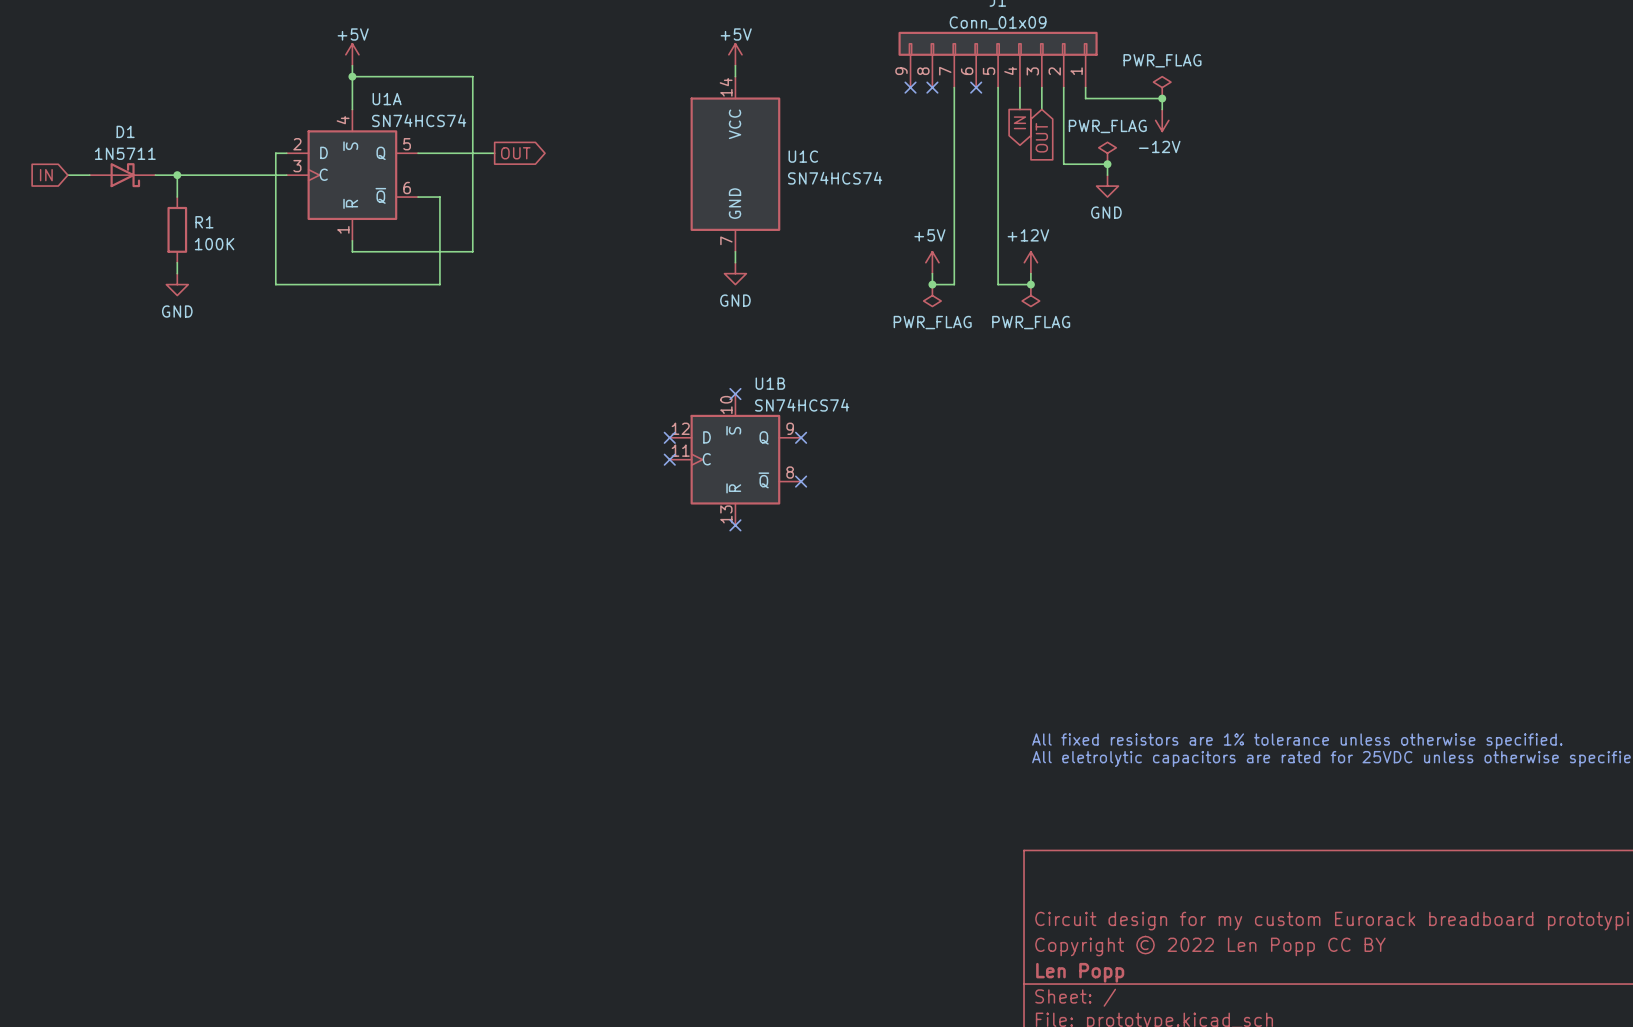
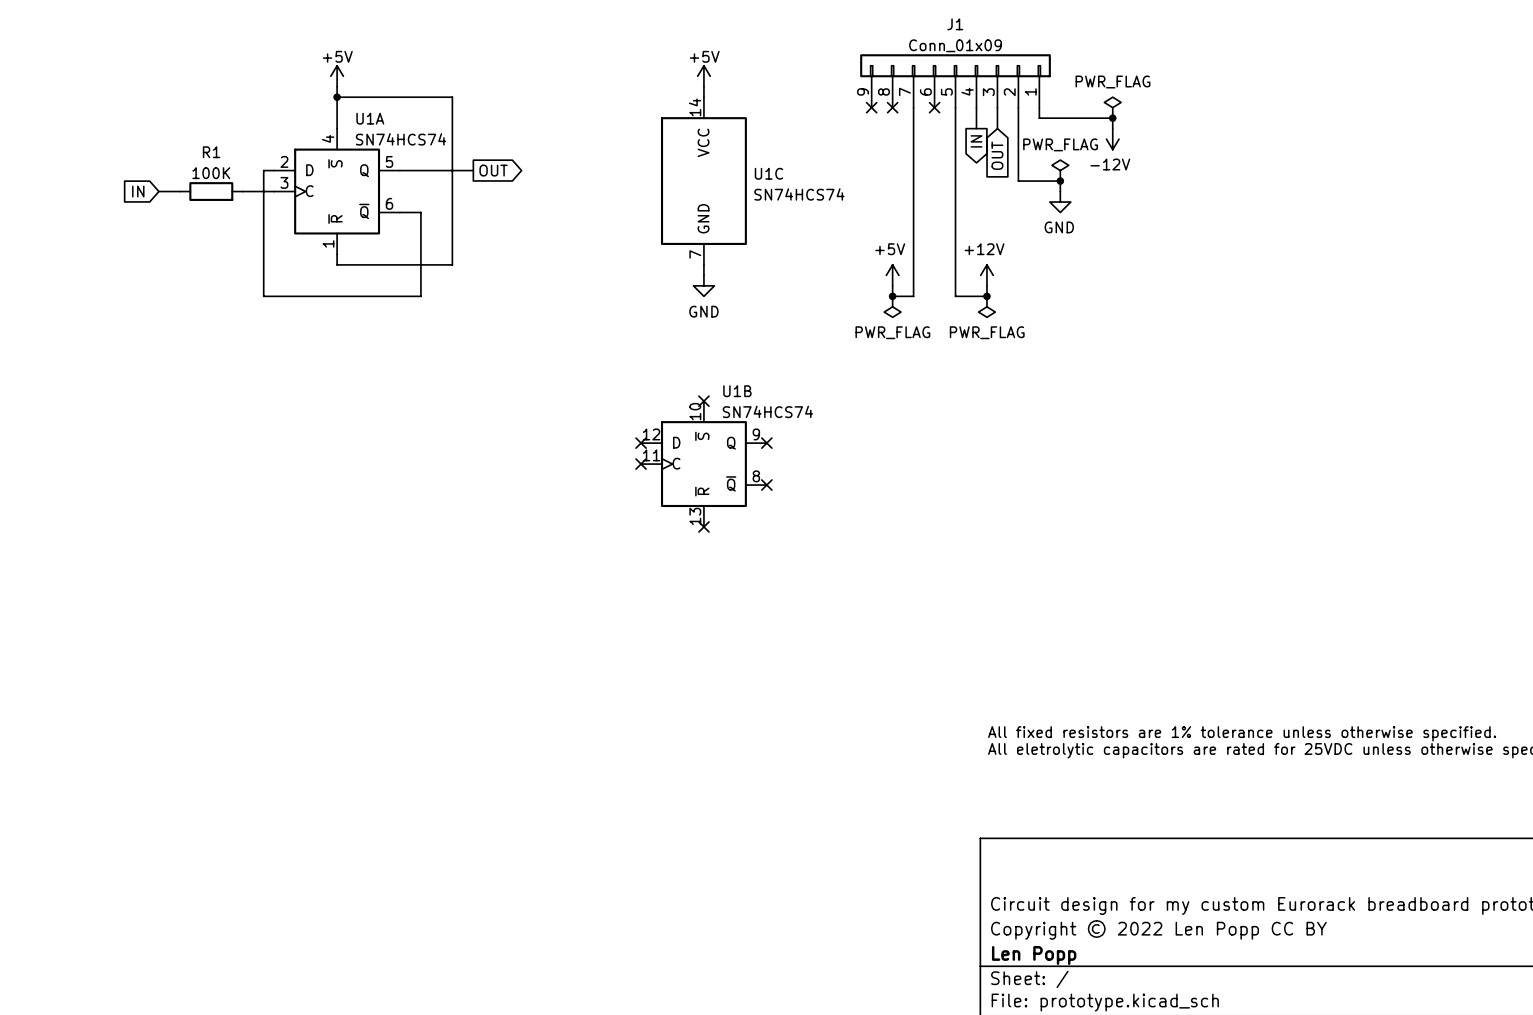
global label position: IN (46, 175) -> IN (138, 191)
wire: (67, 175) (89, 175) -> none
D1: 1N5711 (122, 175) -> none
wire: (155, 175) (166, 175) -> none
wire: (177, 175) (177, 197) -> none
junction: (177, 175) -> none
wire: (188, 175) (253, 175) -> none
R1 name position: R1 (204, 222) -> R1 (211, 152)
R1 rotation: 0° (177, 229) -> 90° clockwise (211, 191)
R1 position: (177, 229) -> (211, 191)
R1 value position: 100K (214, 244) -> 100K (211, 173)
wire: (177, 262) (177, 273) -> none
power symbol: GND (177, 284) -> none

